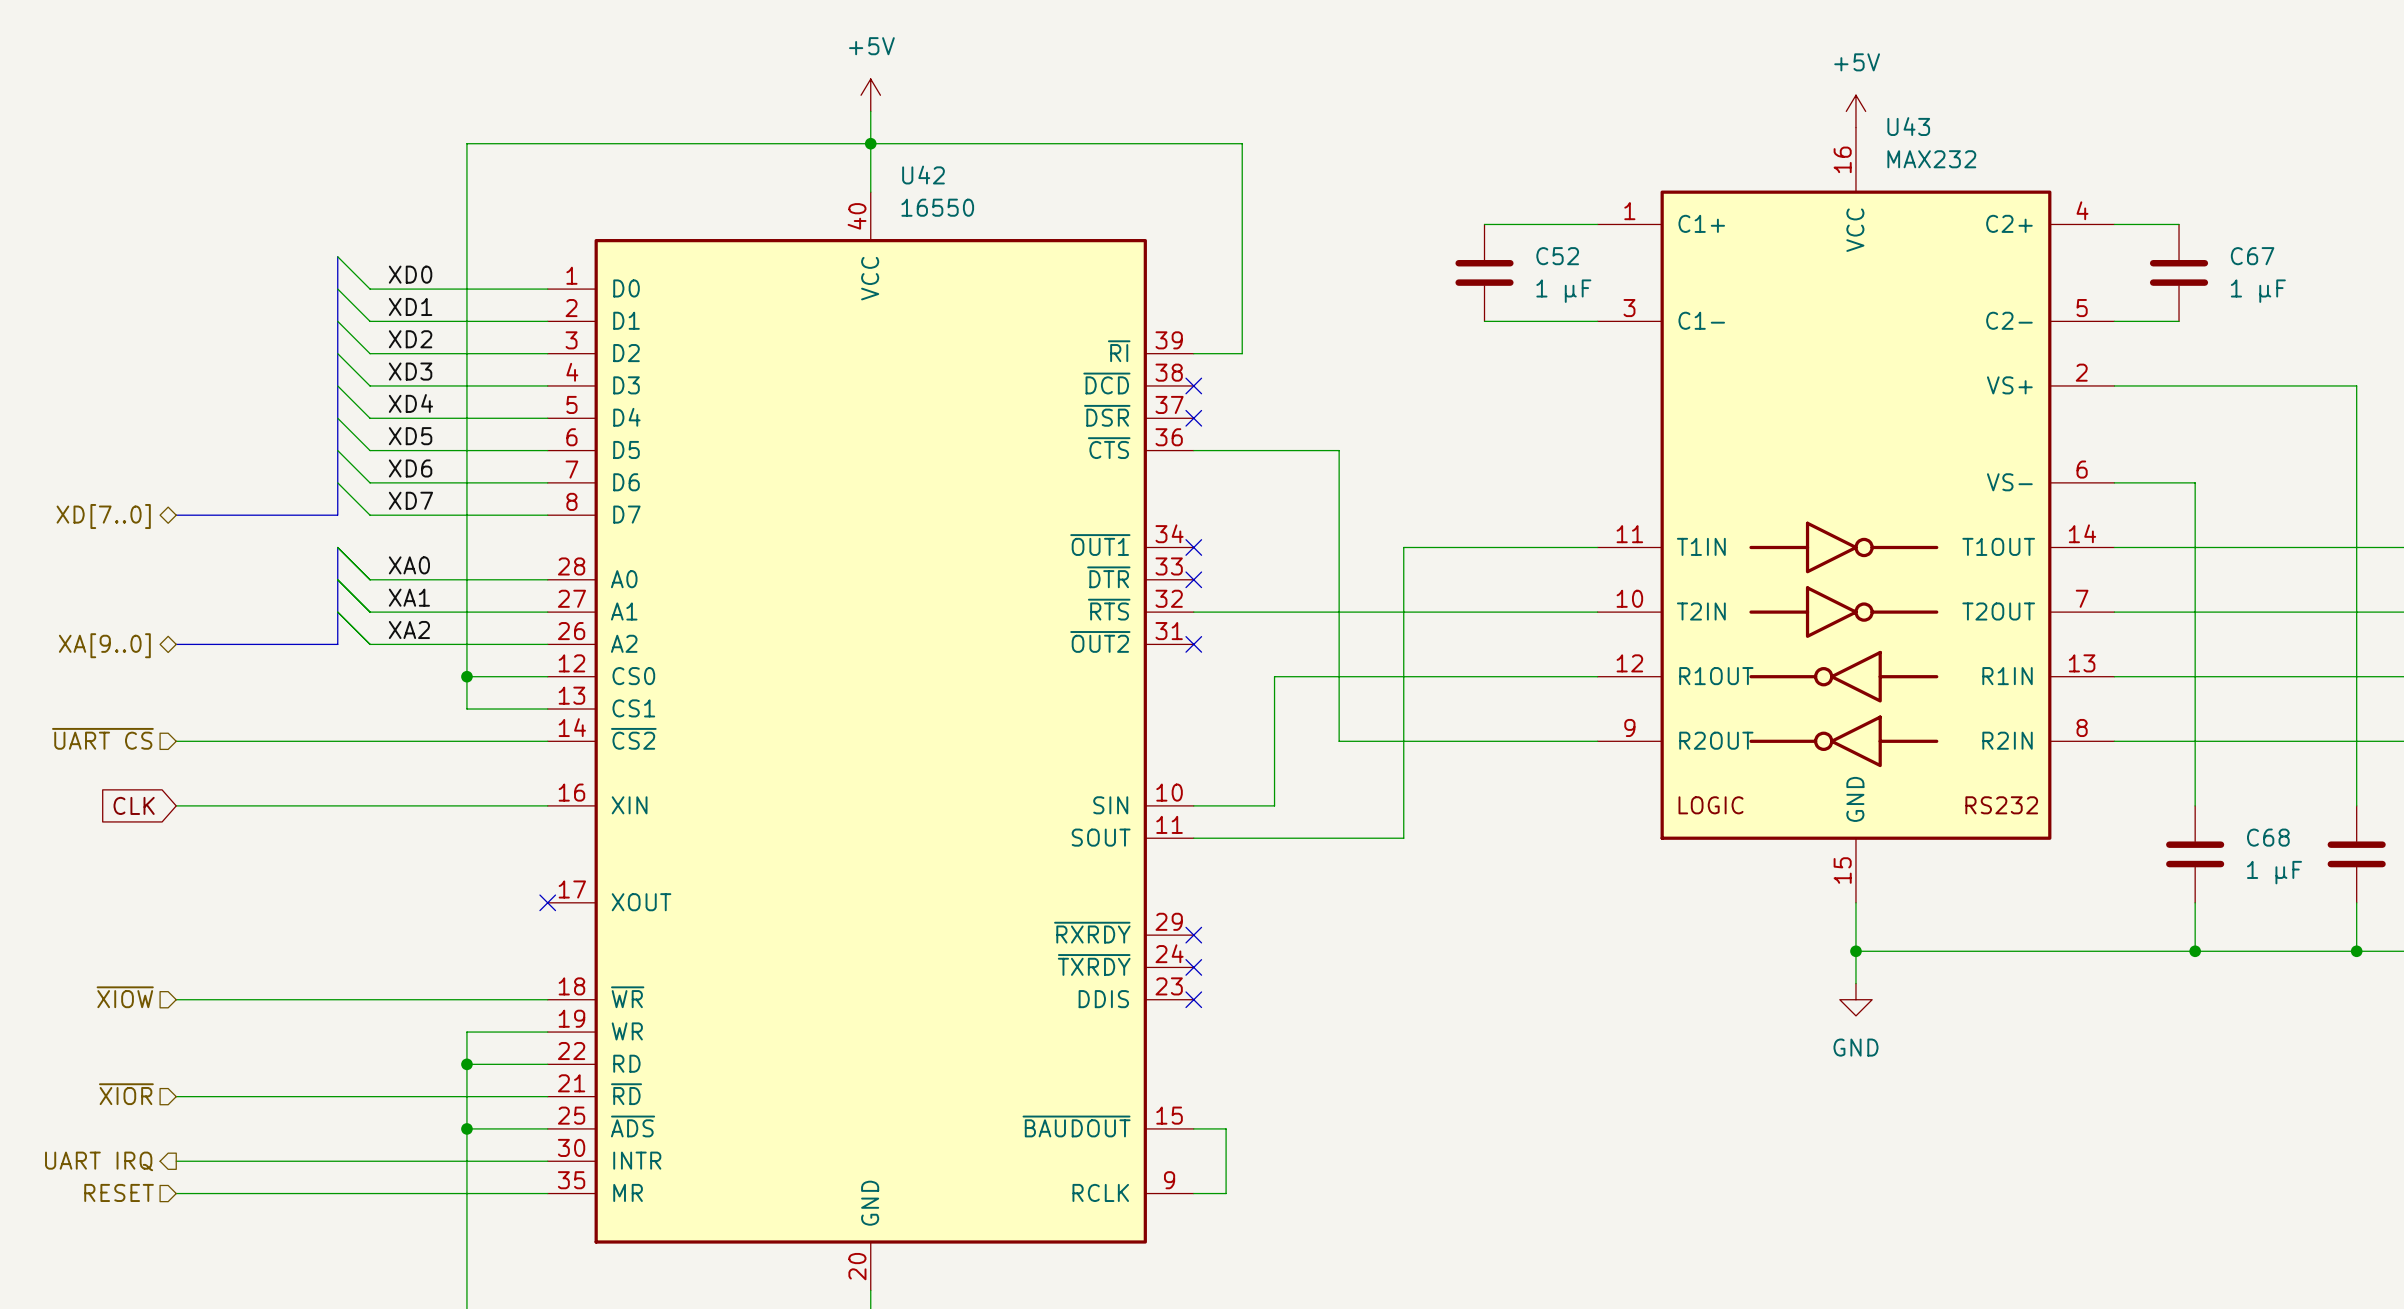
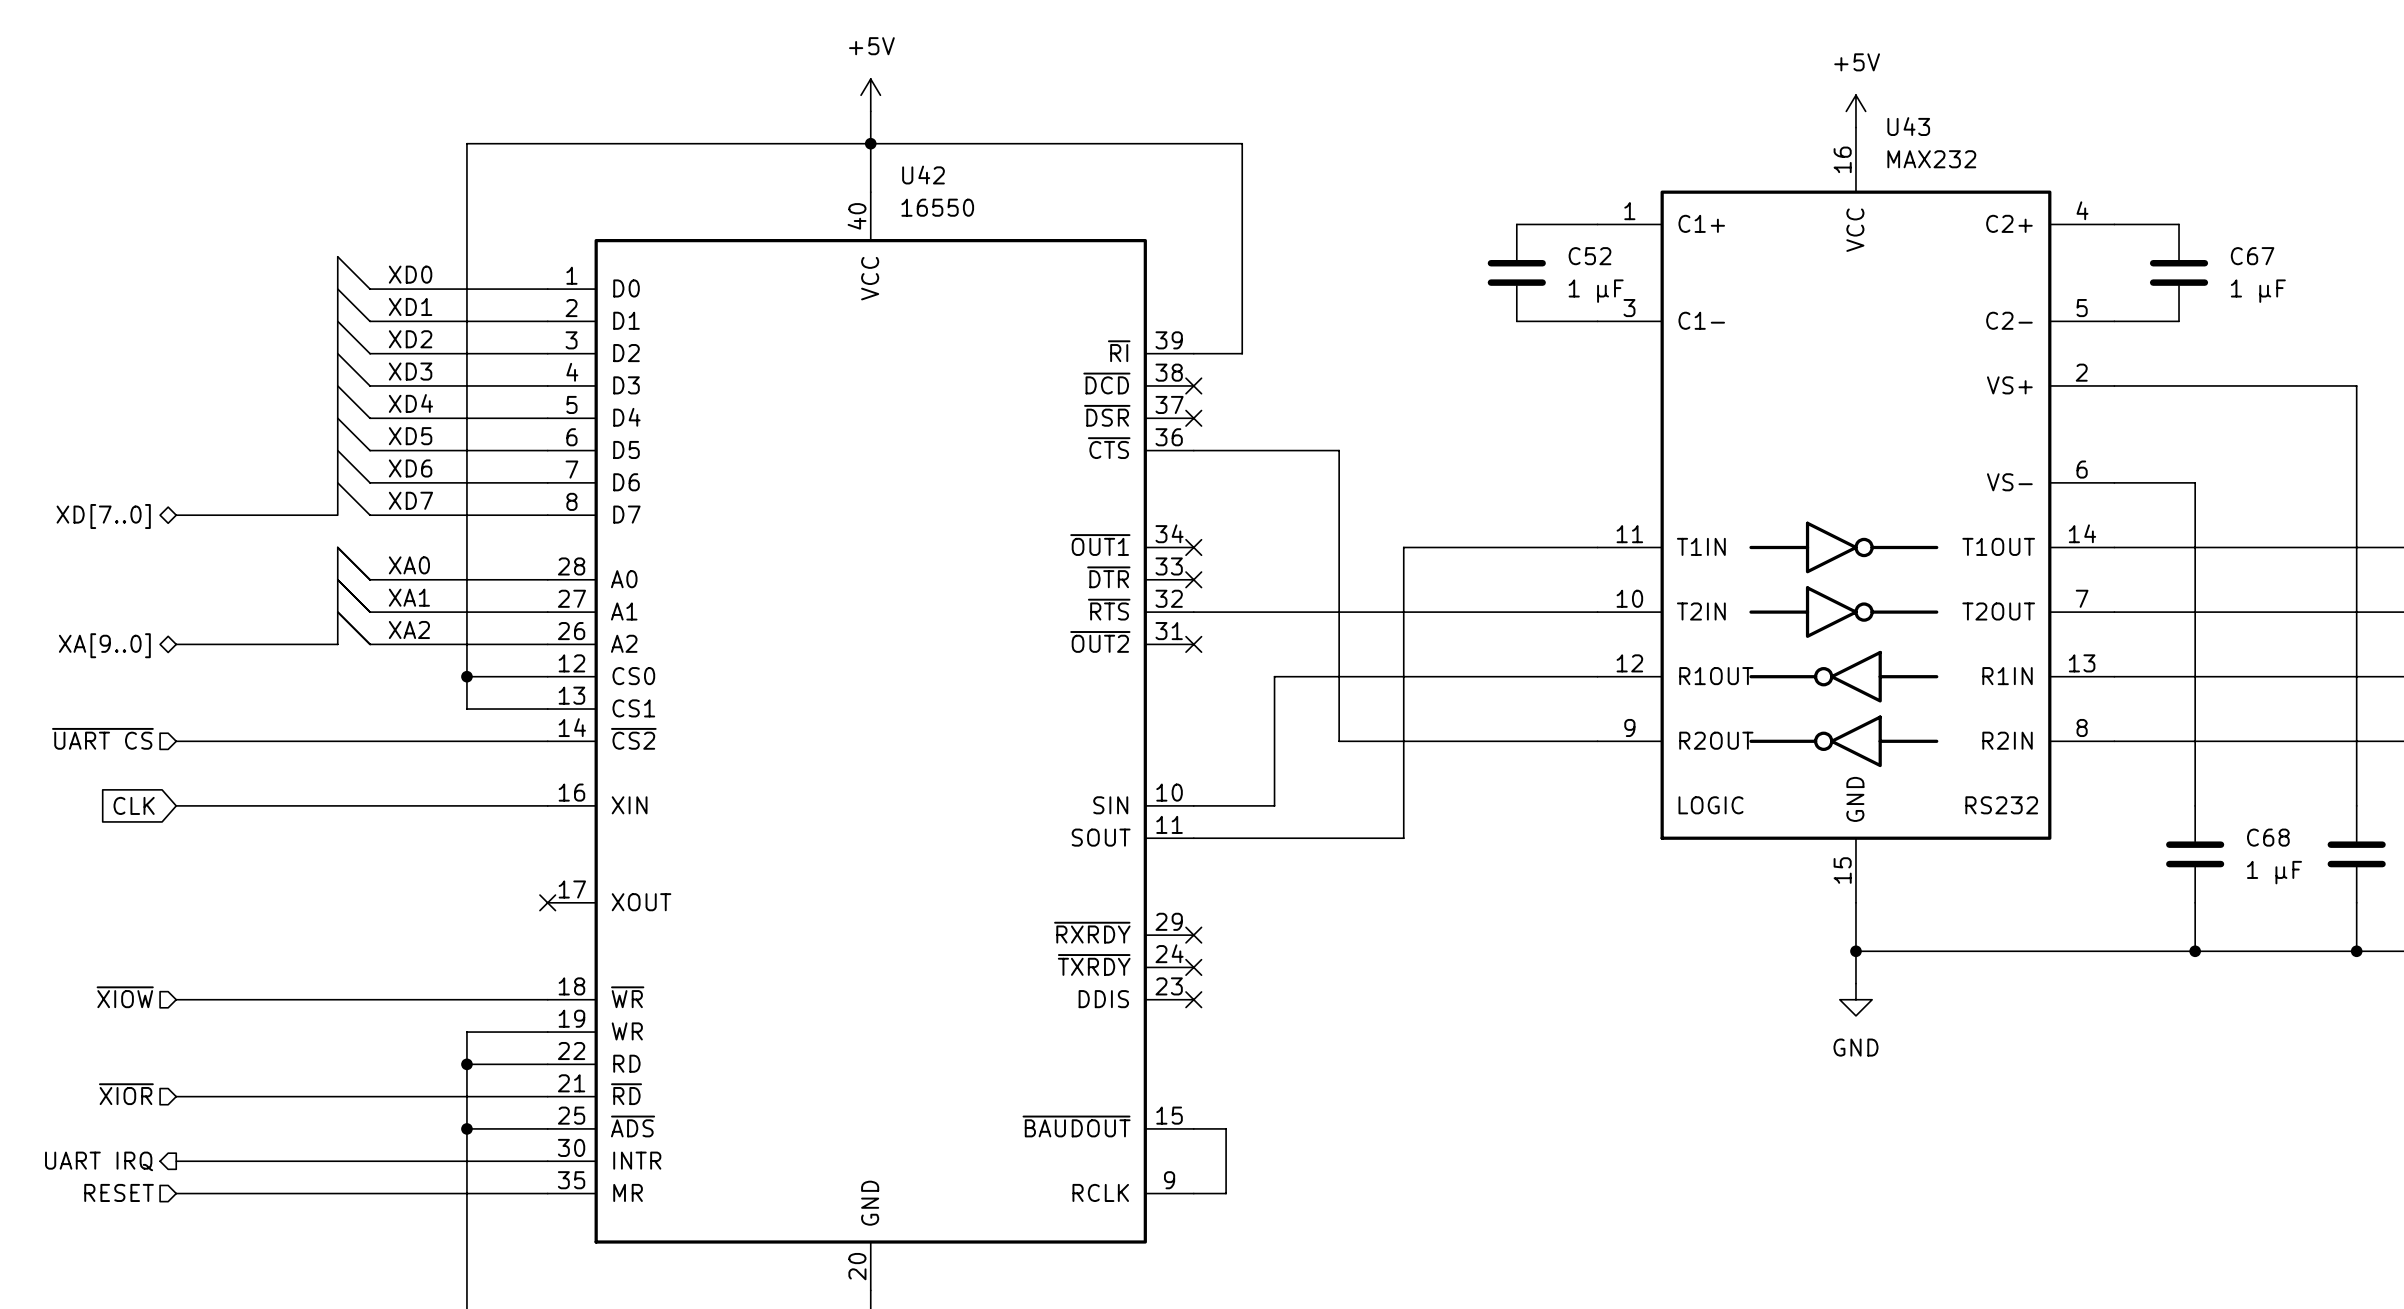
wire: (1484, 224) (1516, 224) -> none
C52 position: (1484, 272) -> (1516, 272)
wire: (1484, 321) (1516, 321) -> none

